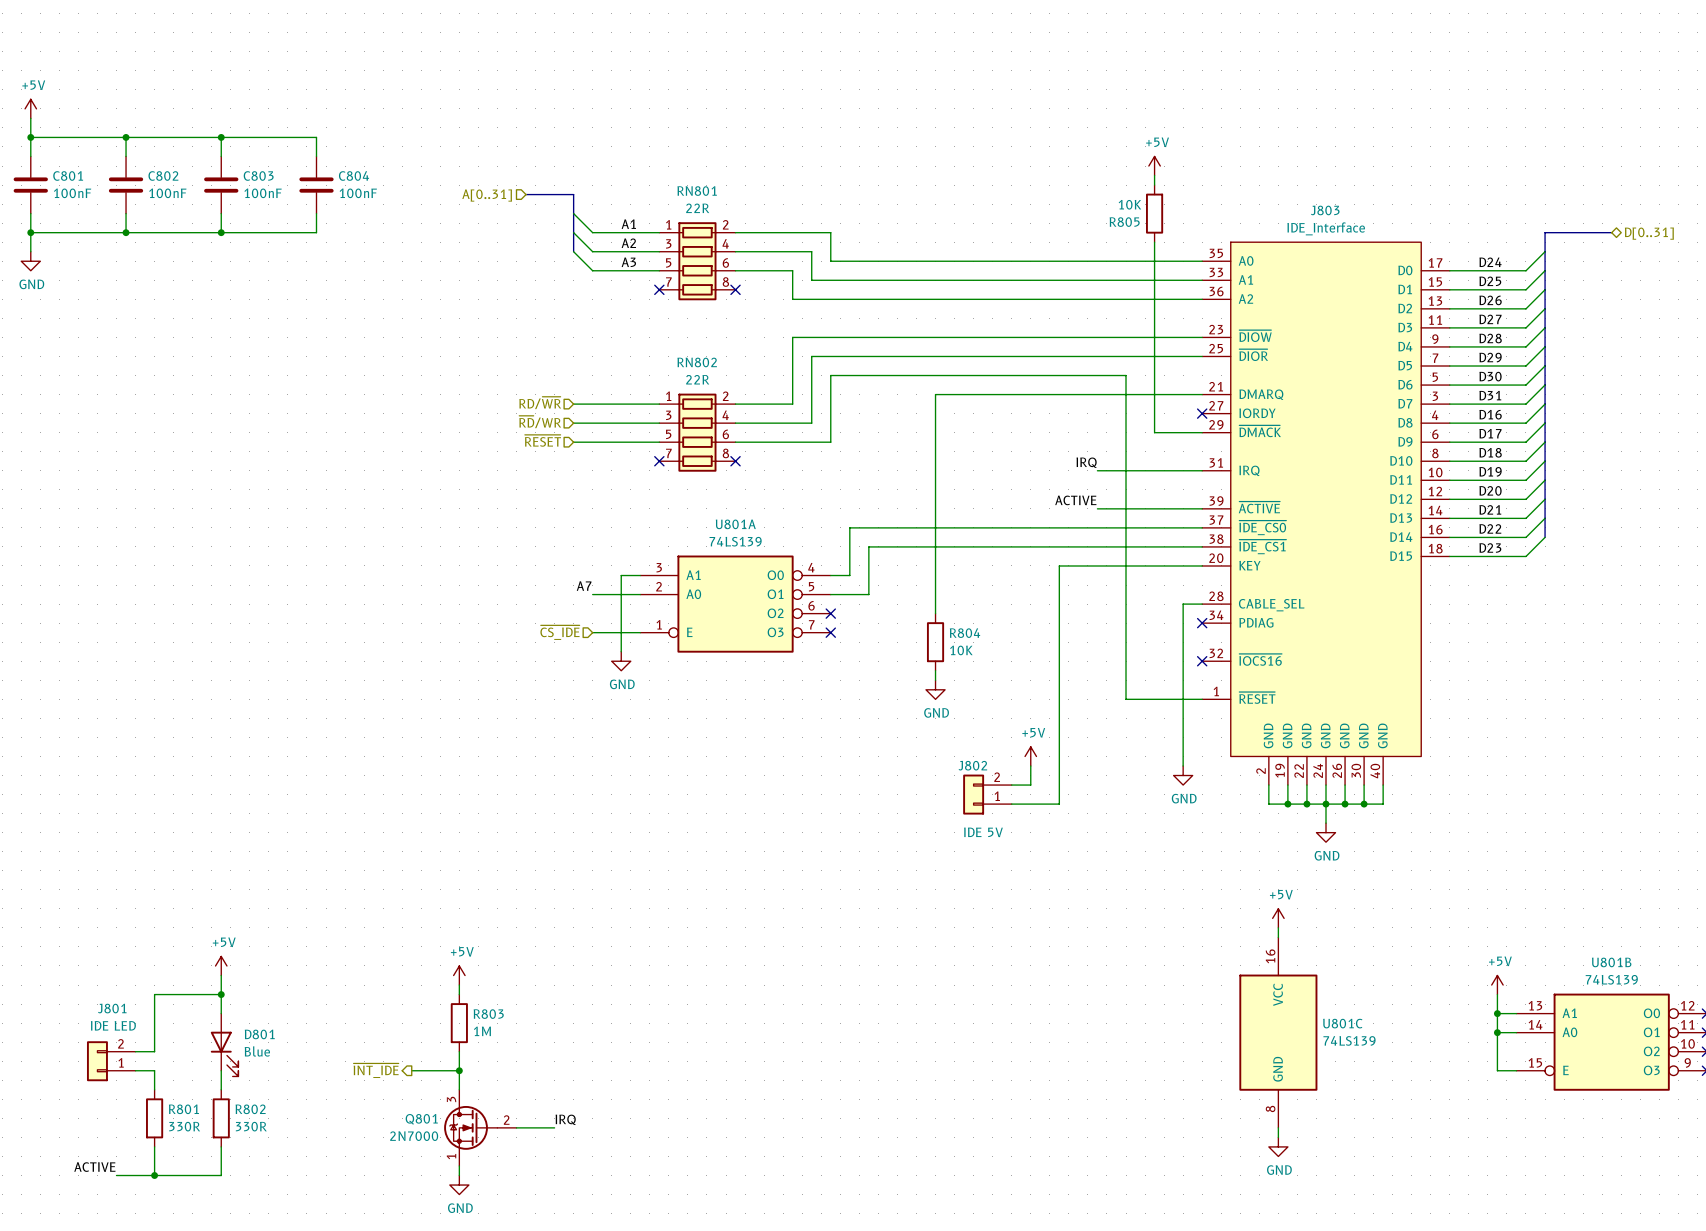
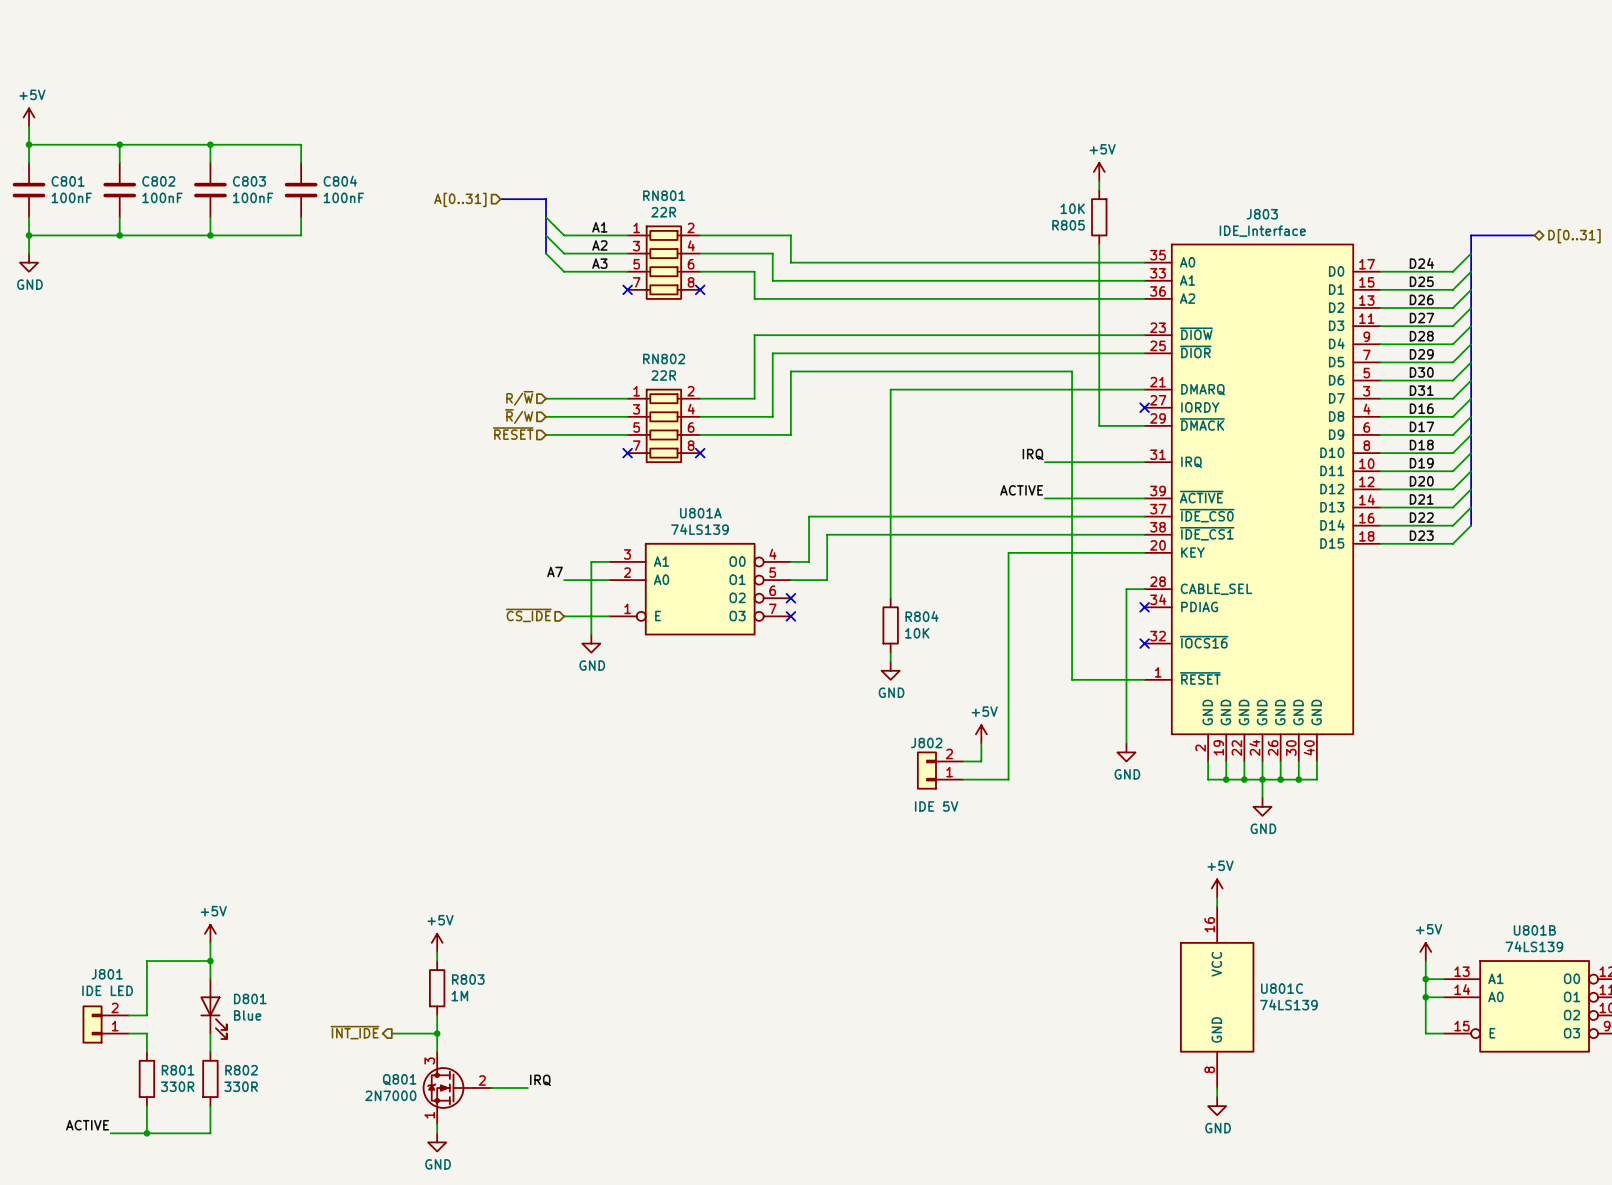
hierarchical label: RD/~{WR} (540, 402) -> R/~{W} (519, 398)
hierarchical label: ~{RD}/WR (540, 422) -> ~{R}/W (519, 416)

